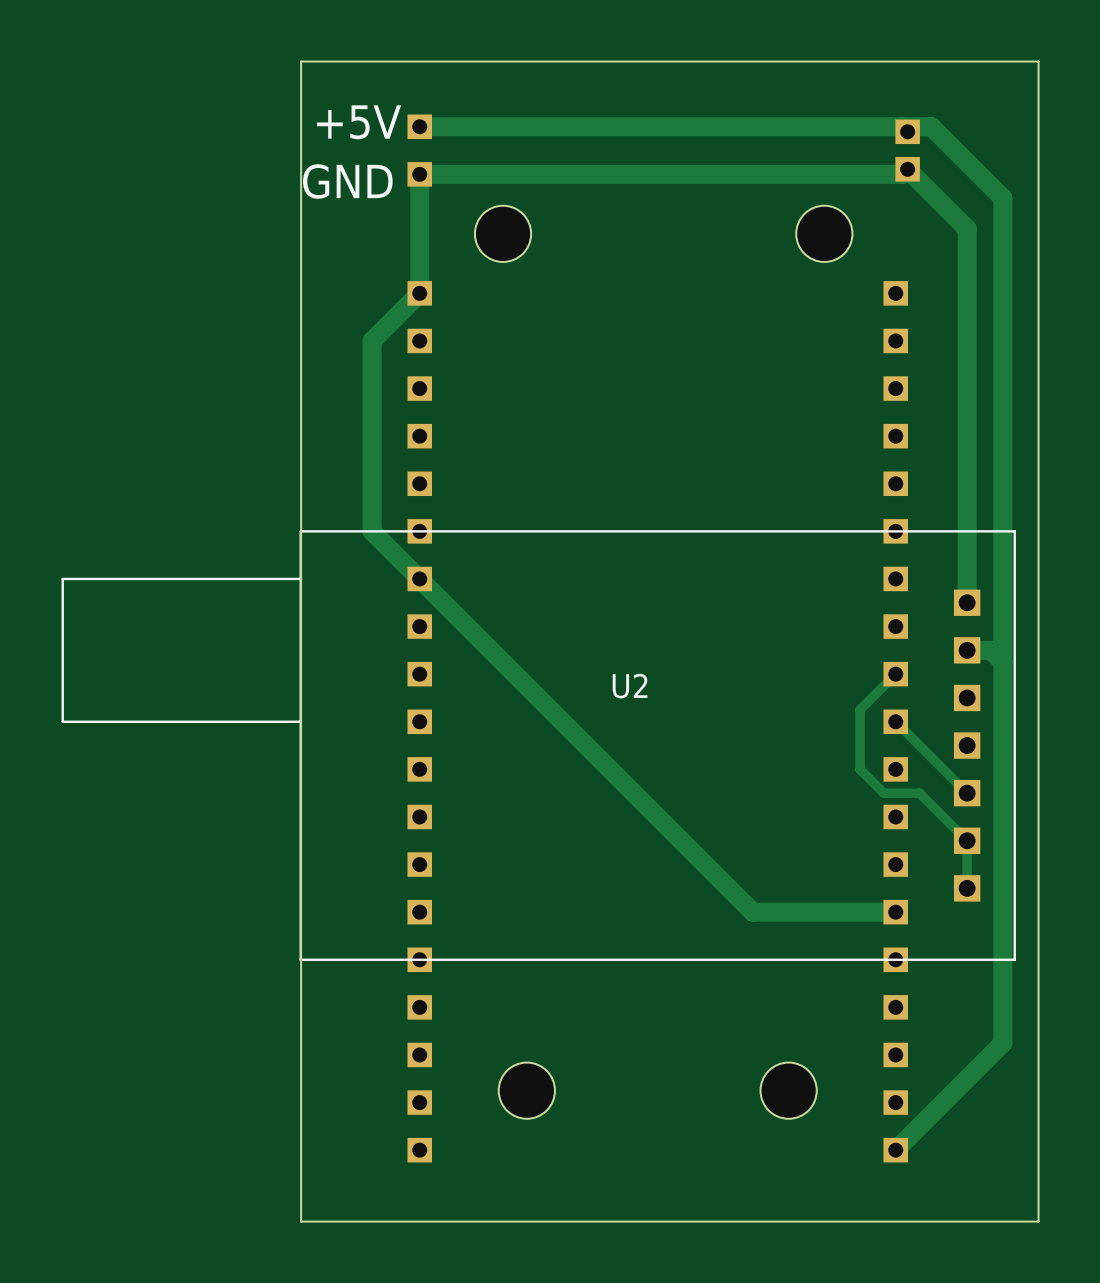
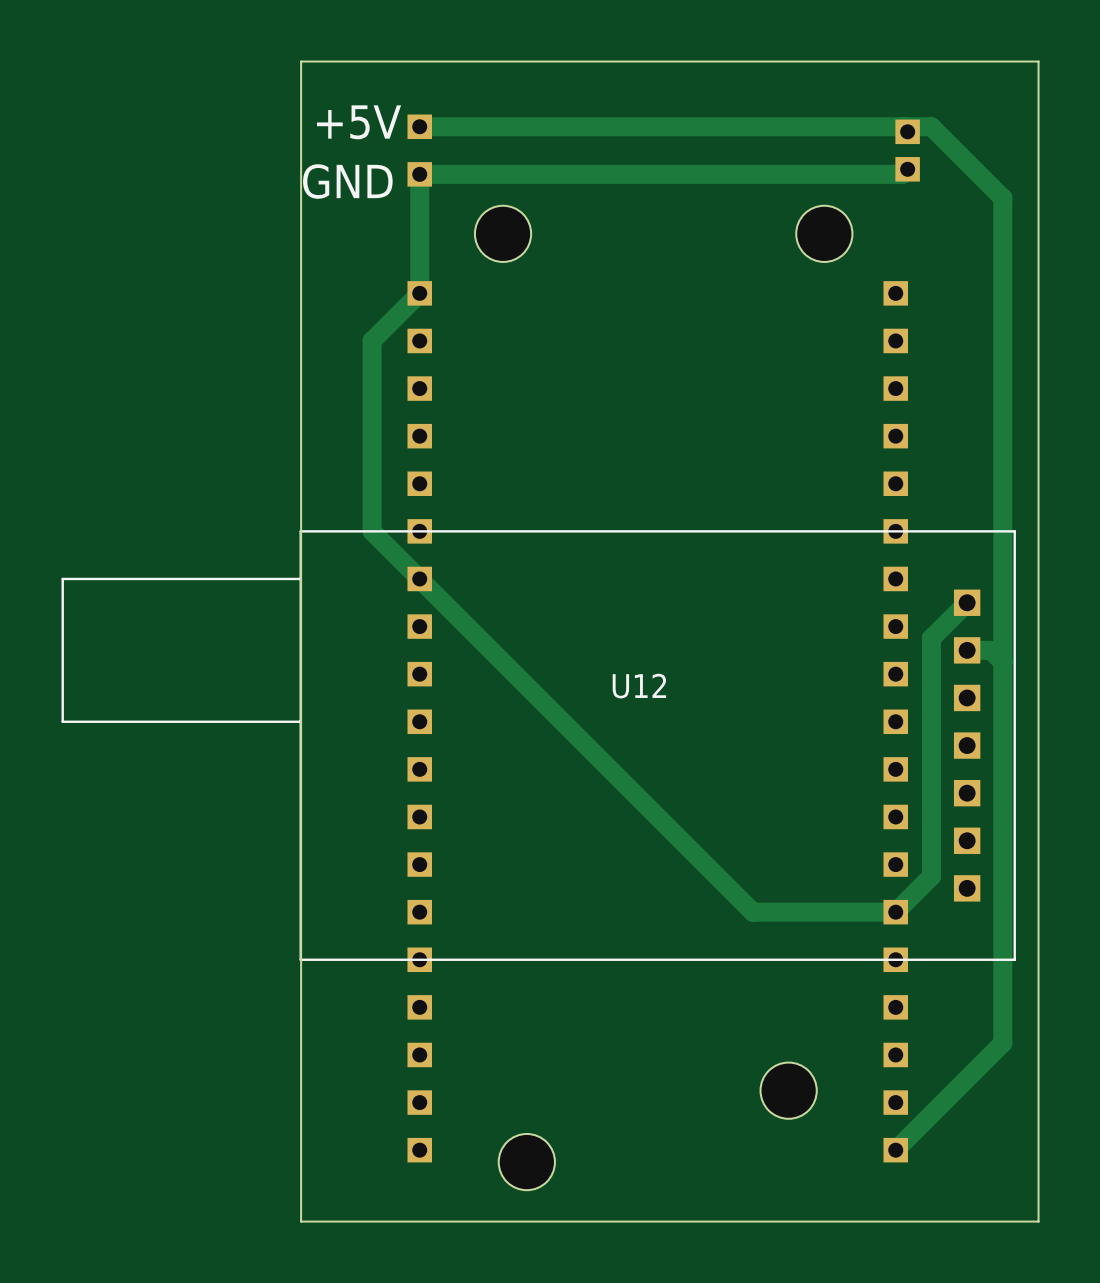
track: (907, 169) (967, 228) (967, 602) -> (895, 912) (931, 876) (931, 638) (967, 602)
track: (895, 674) (860, 709) (860, 769) (883, 793) (919, 793) (967, 840) (967, 888) -> none
U2 name: U2 (630, 686) -> U12 (639, 686)
track: (895, 721) (967, 793) -> none
hole position: (526, 1090) -> (526, 1162)

